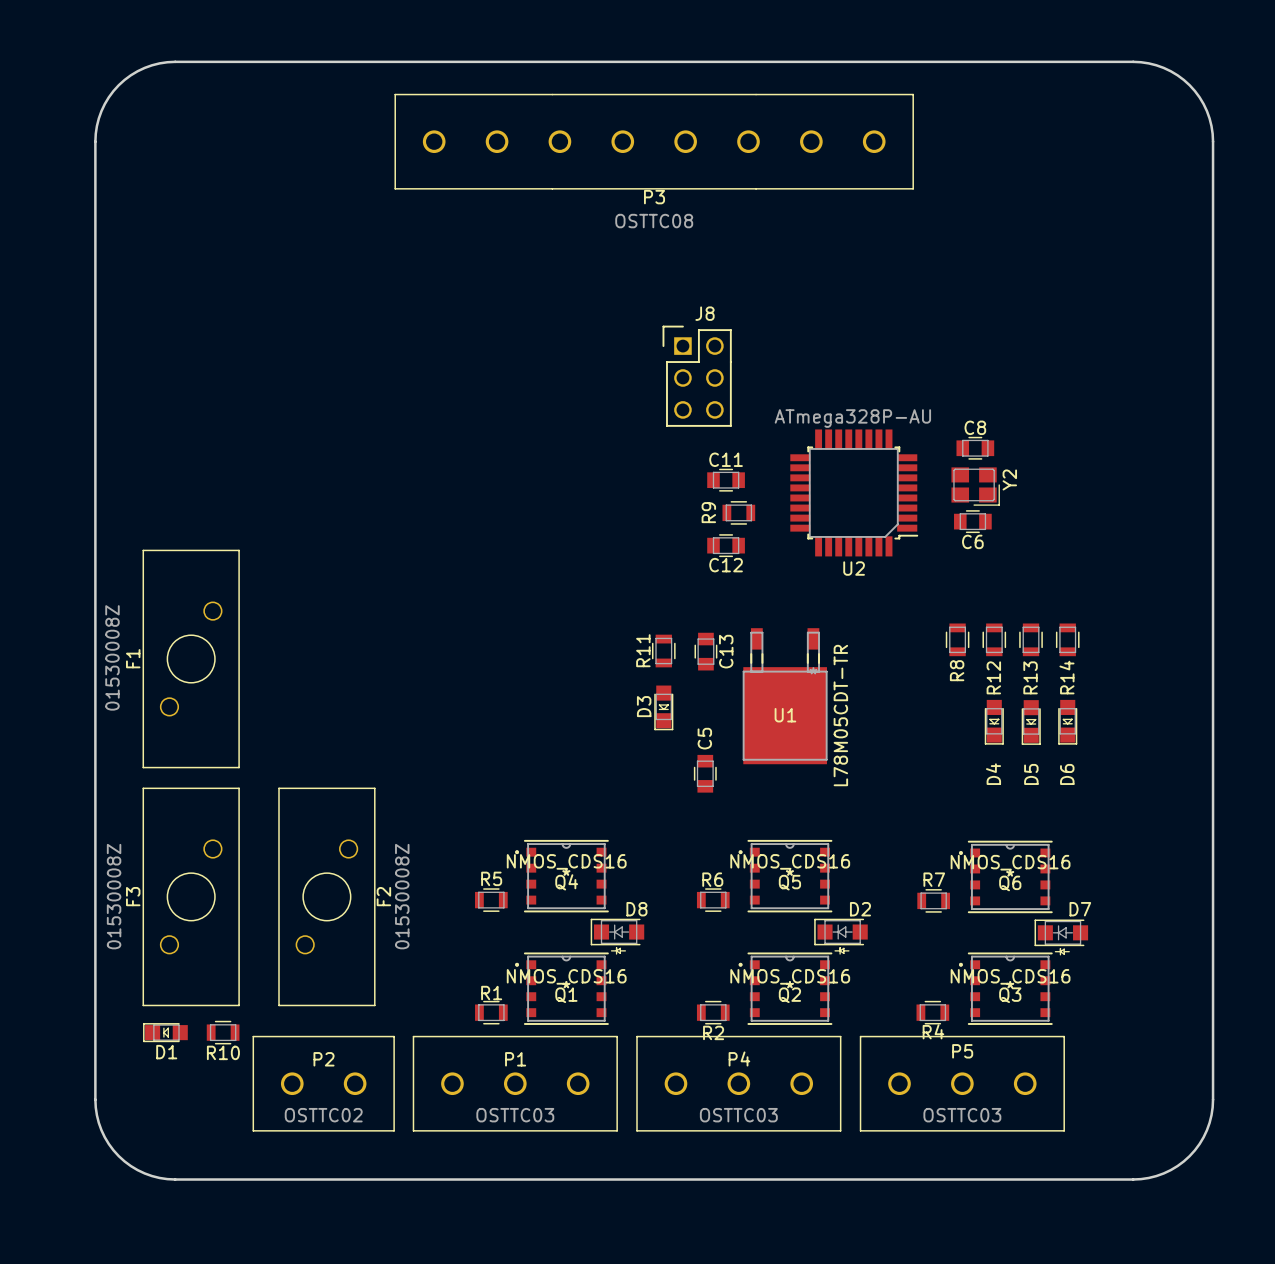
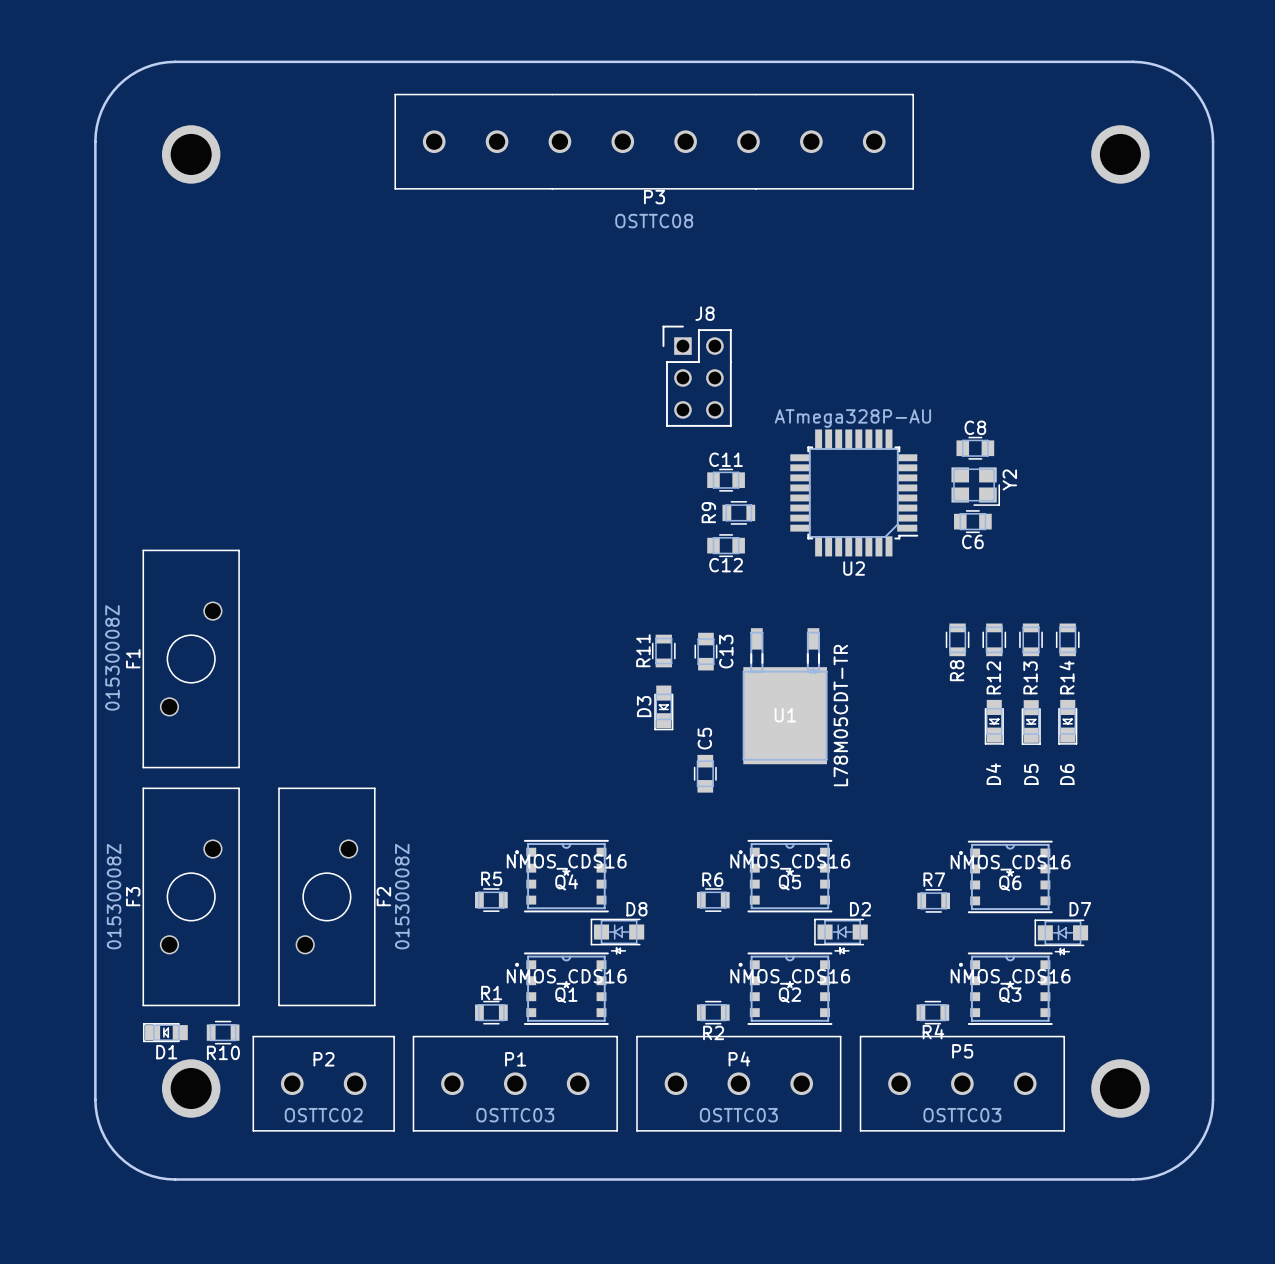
part: none -> (191, 154)
part: none -> (1120, 154)
part: none -> (191, 1088)
part: none -> (1120, 1088)

